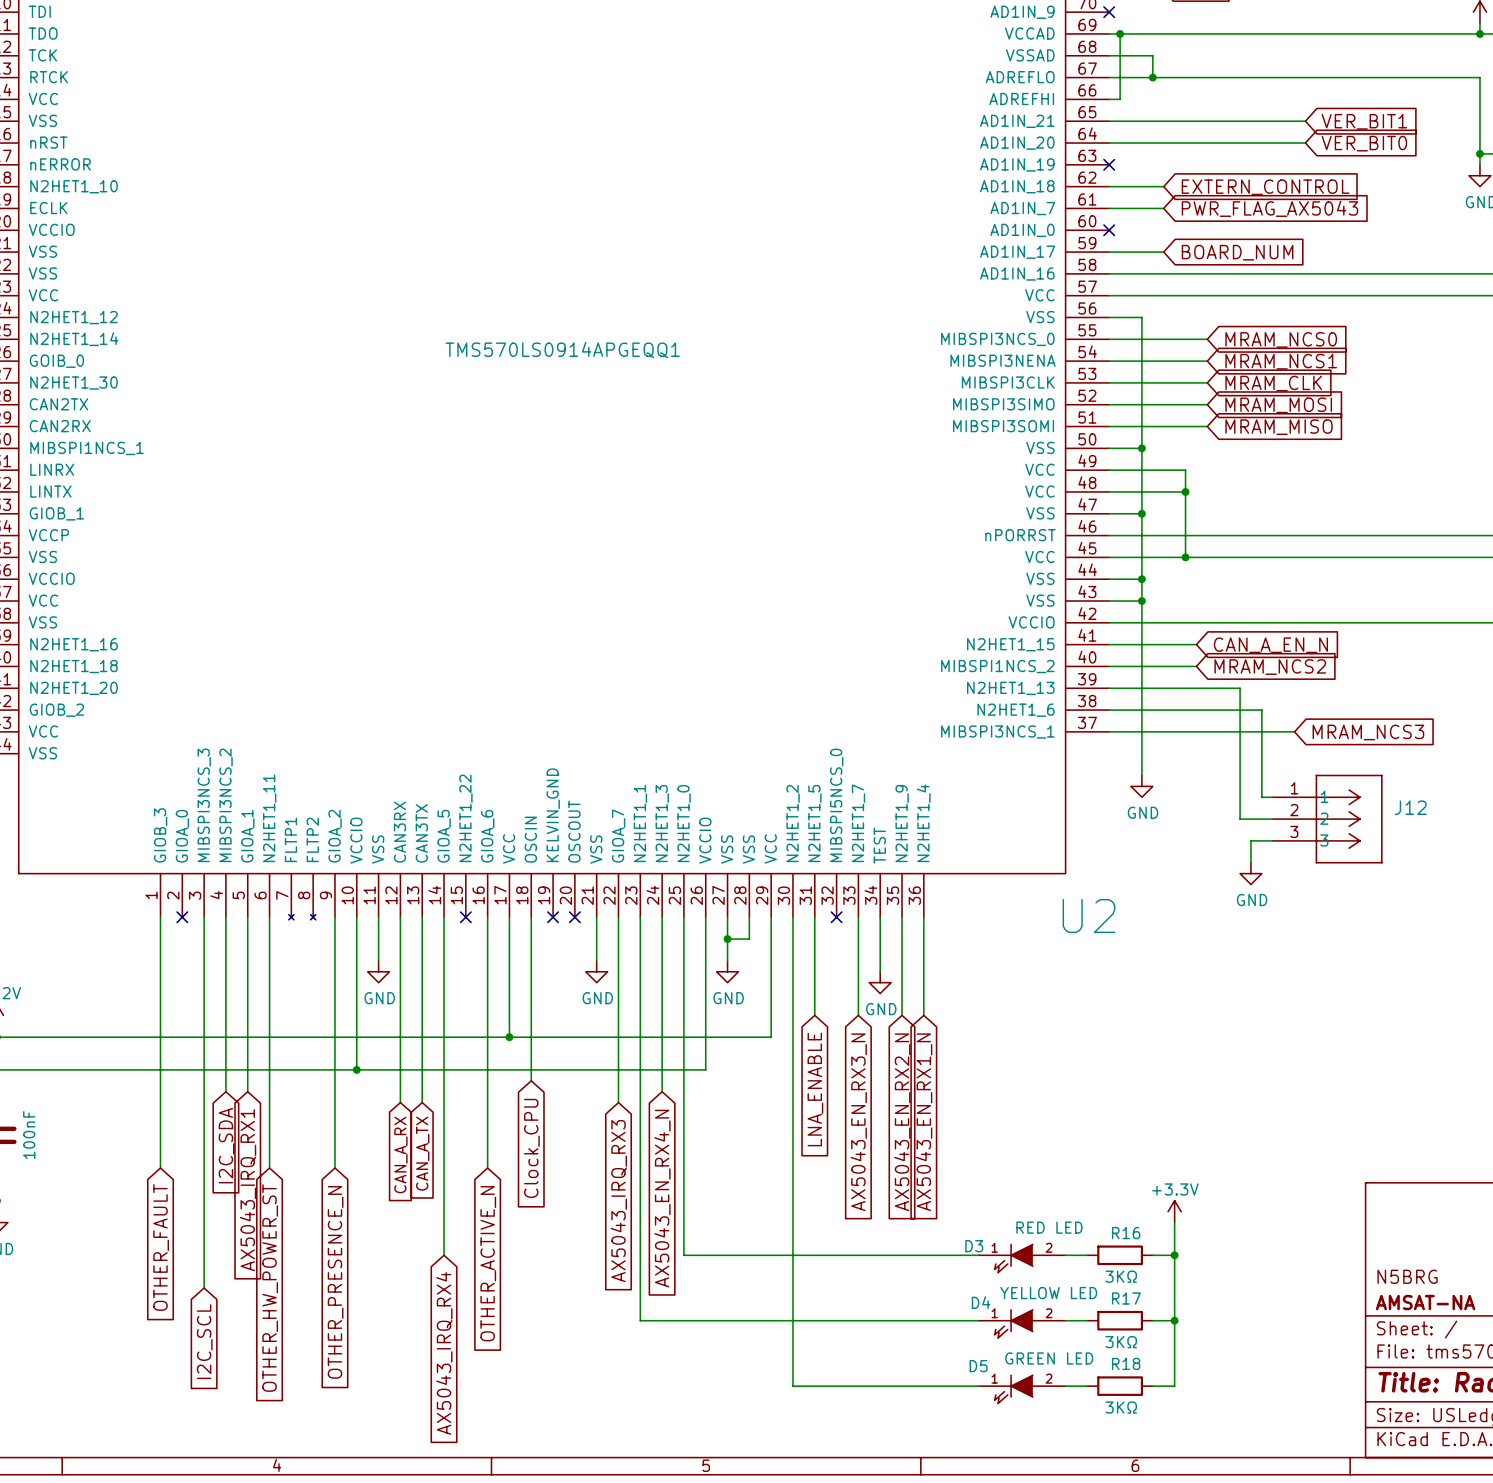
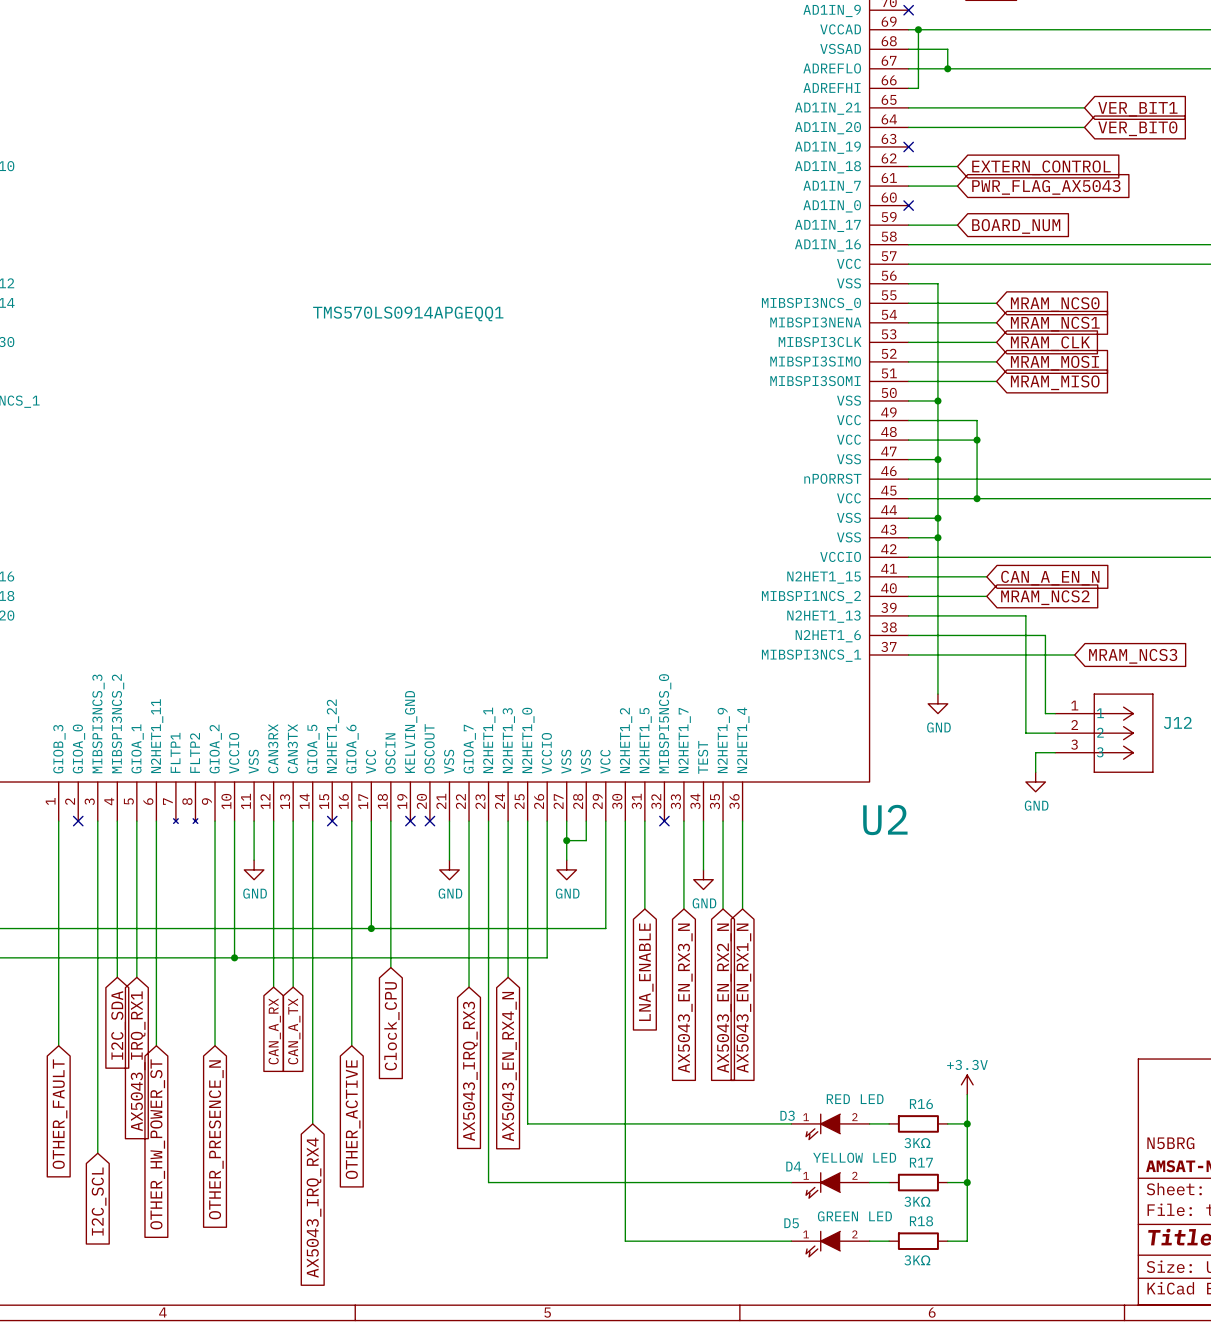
global label: OTHER_ACTIVE_N (488, 1263) -> OTHER_ACTIVE (353, 1119)

